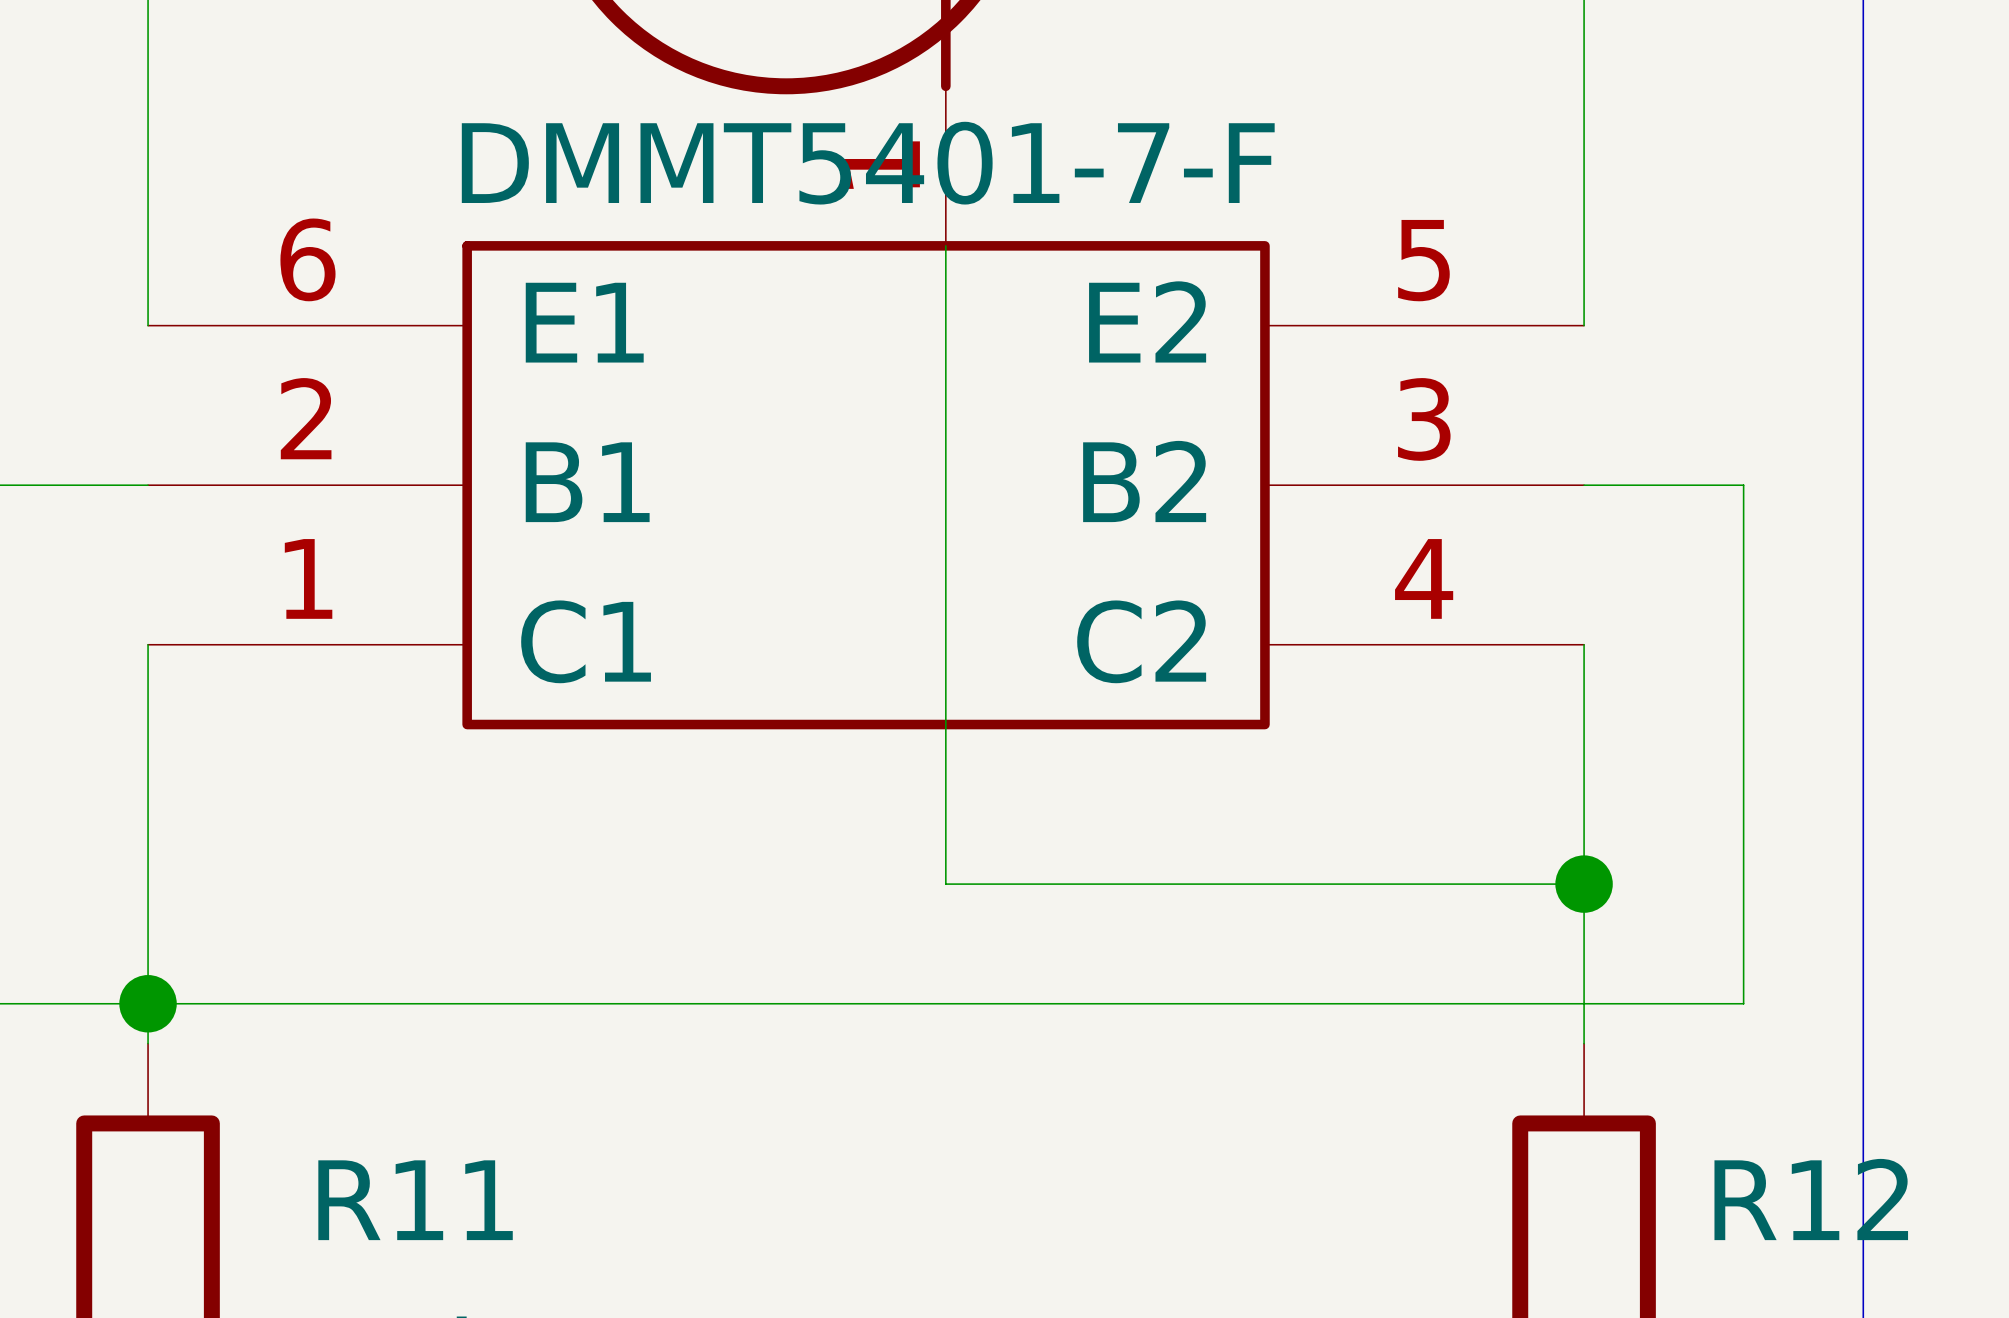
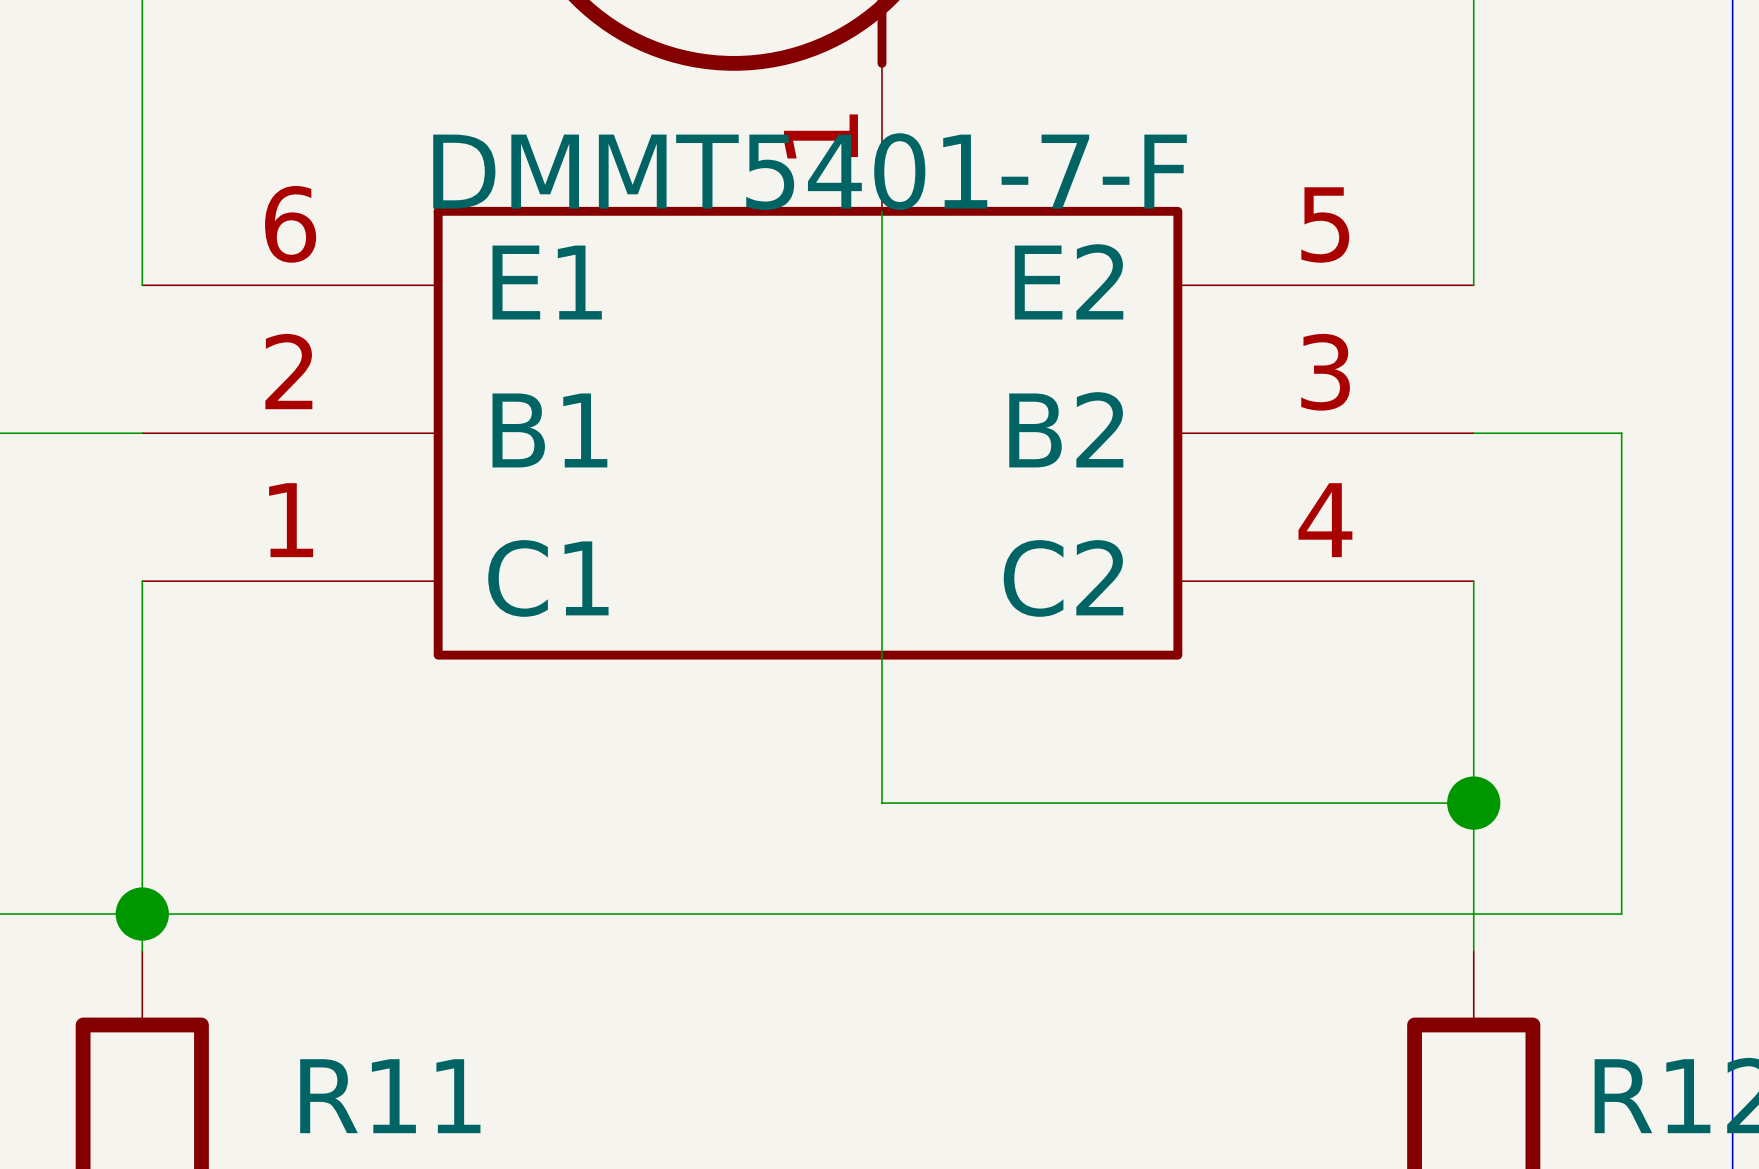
part value position: DMMT5401-7-F (868, 163) -> DMMT5401-7-F (810, 171)

